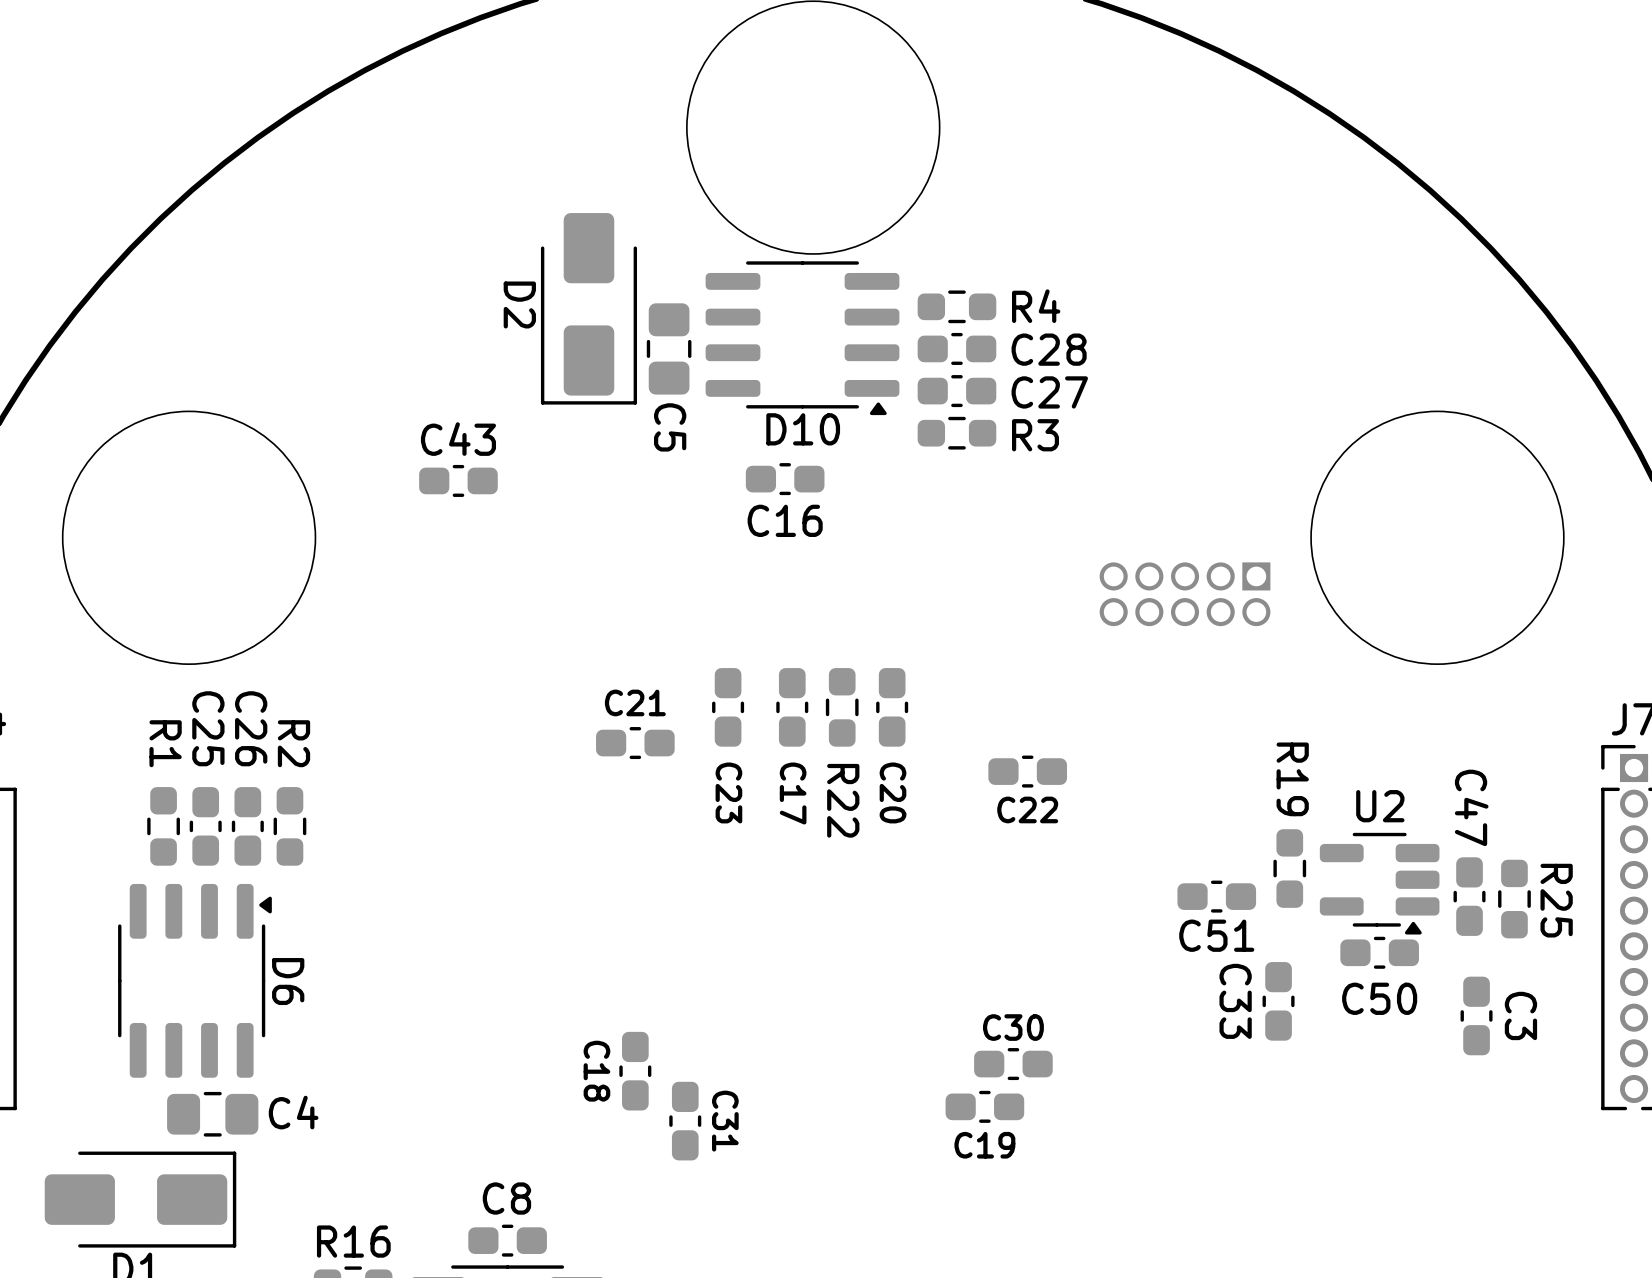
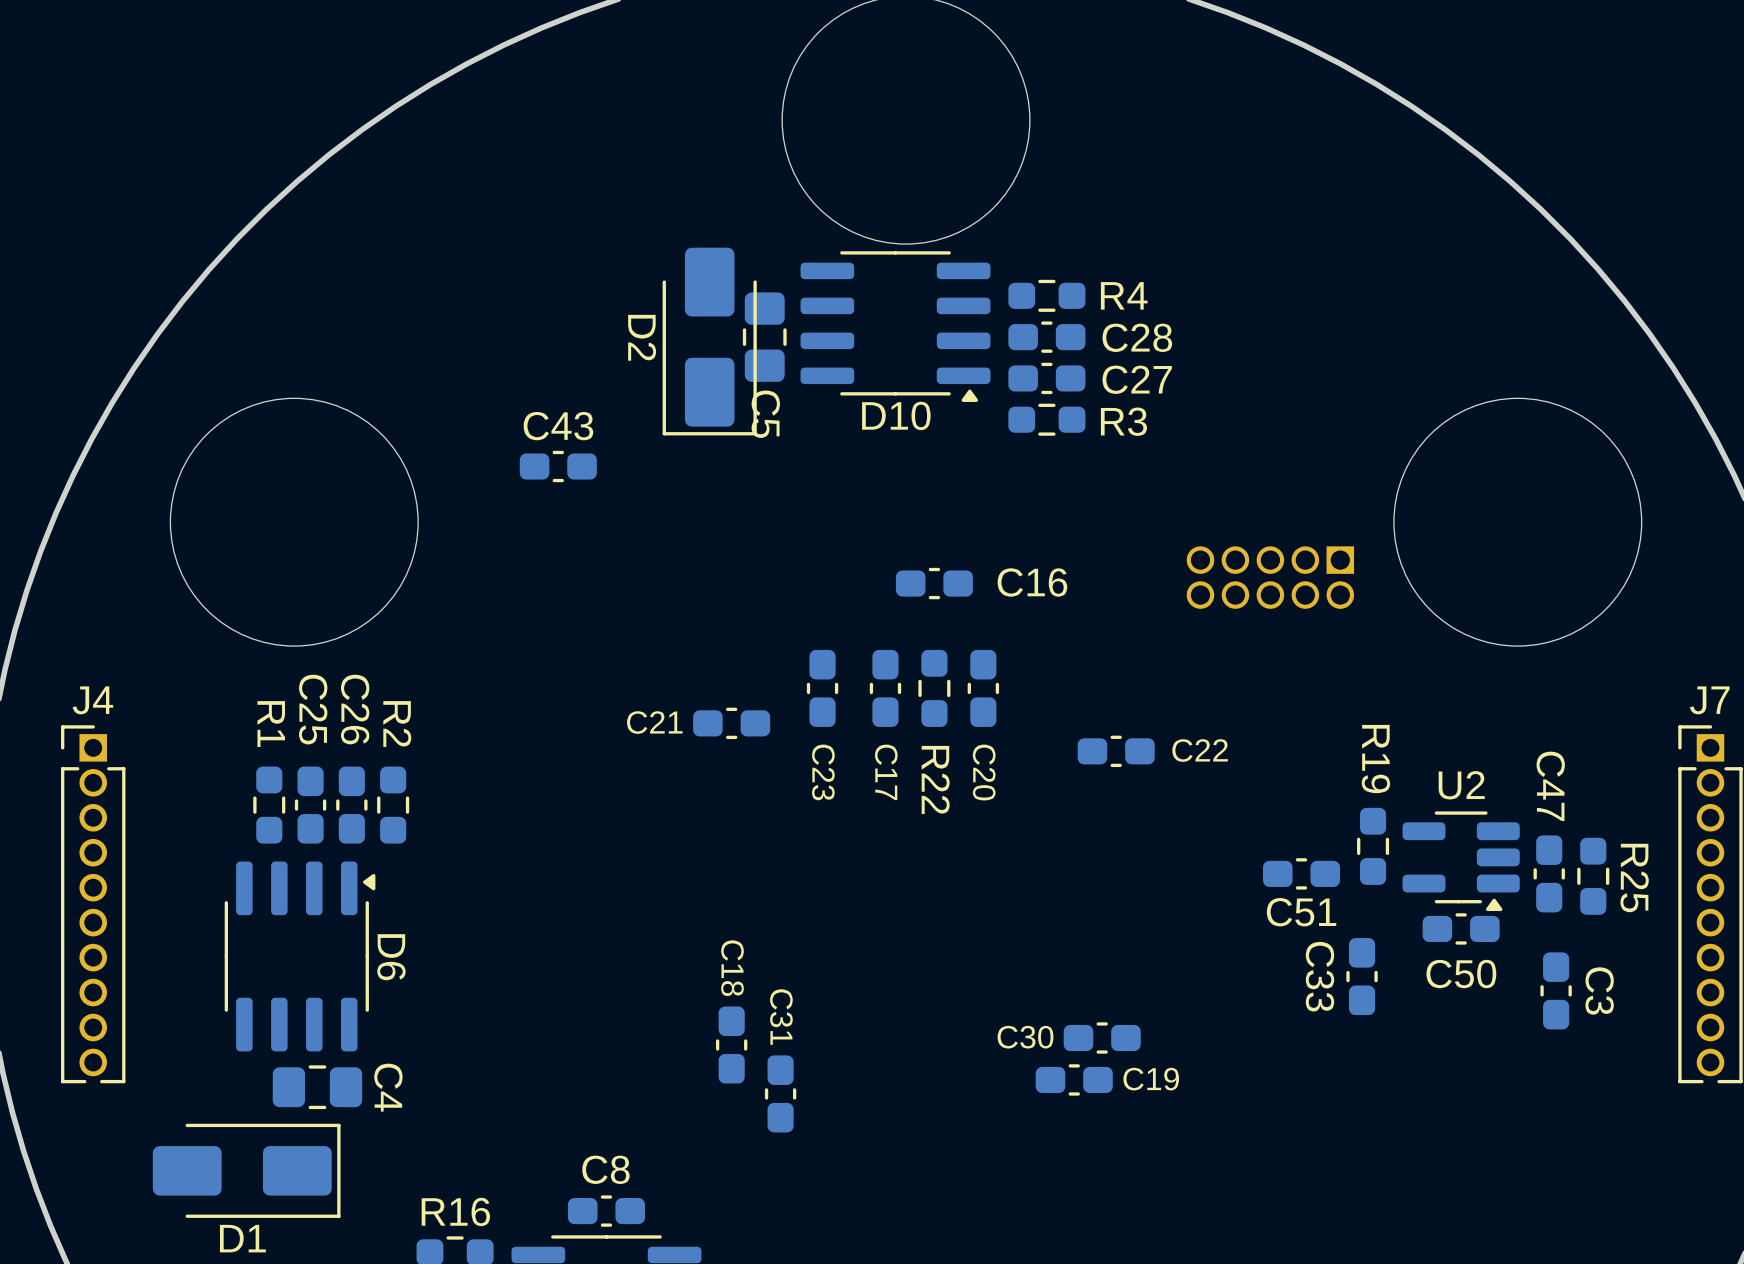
D2 position: (588, 308) -> (709, 341)
C16 position: (785, 479) -> (934, 583)
C16 name position: C16 (785, 520) -> C16 (1032, 582)
C21 name position: C21 (635, 702) -> C21 (654, 722)
C22 name position: C22 (1027, 809) -> C22 (1200, 750)
C30 name position: C30 (1013, 1027) -> C30 (1025, 1037)
C18 name position: C18 (596, 1071) -> C18 (732, 968)
C4 name rotation: 0° (293, 1112) -> 90° clockwise (388, 1087)
C31 name position: C31 (725, 1121) -> C31 (781, 1017)
C19 name position: C19 (984, 1145) -> C19 (1151, 1079)

